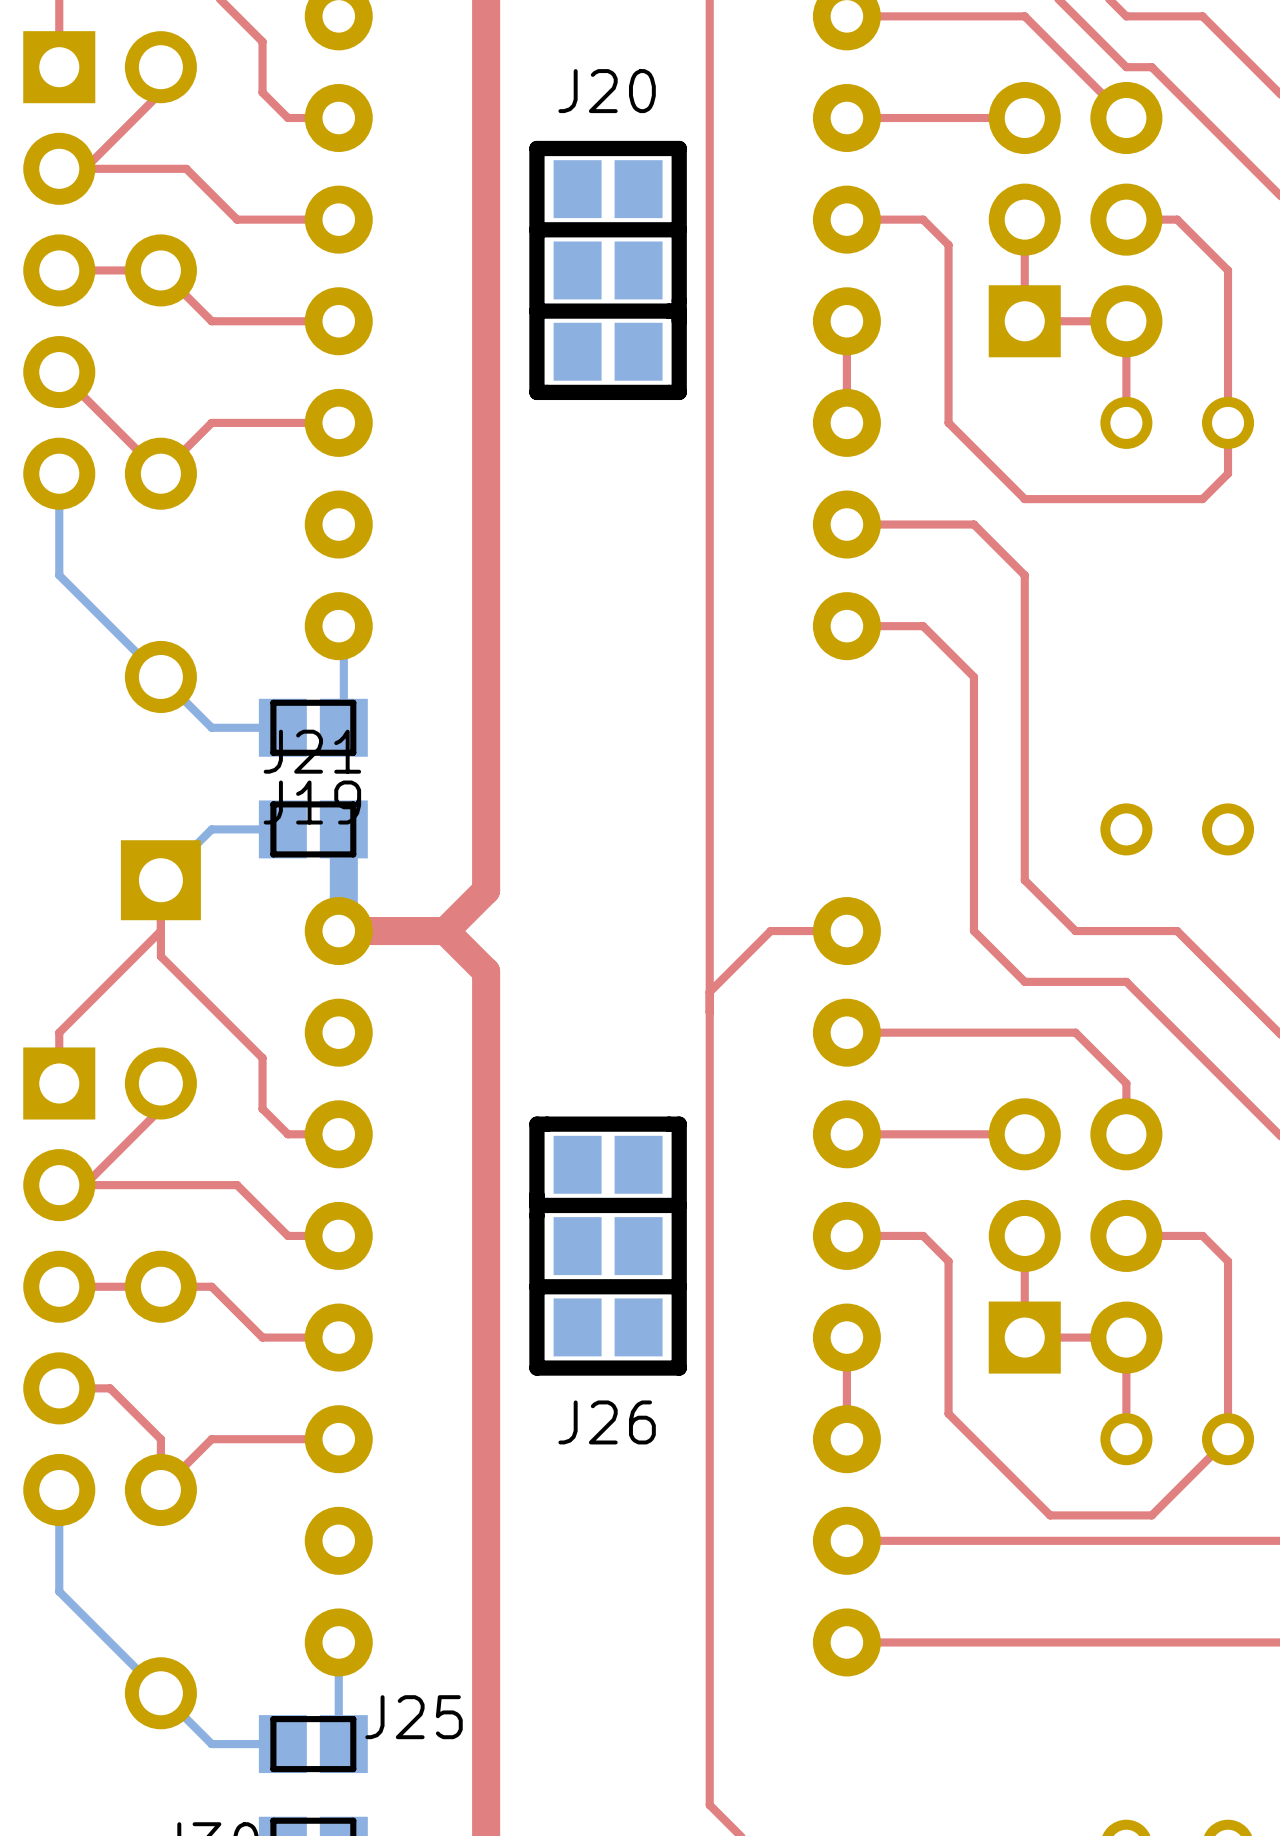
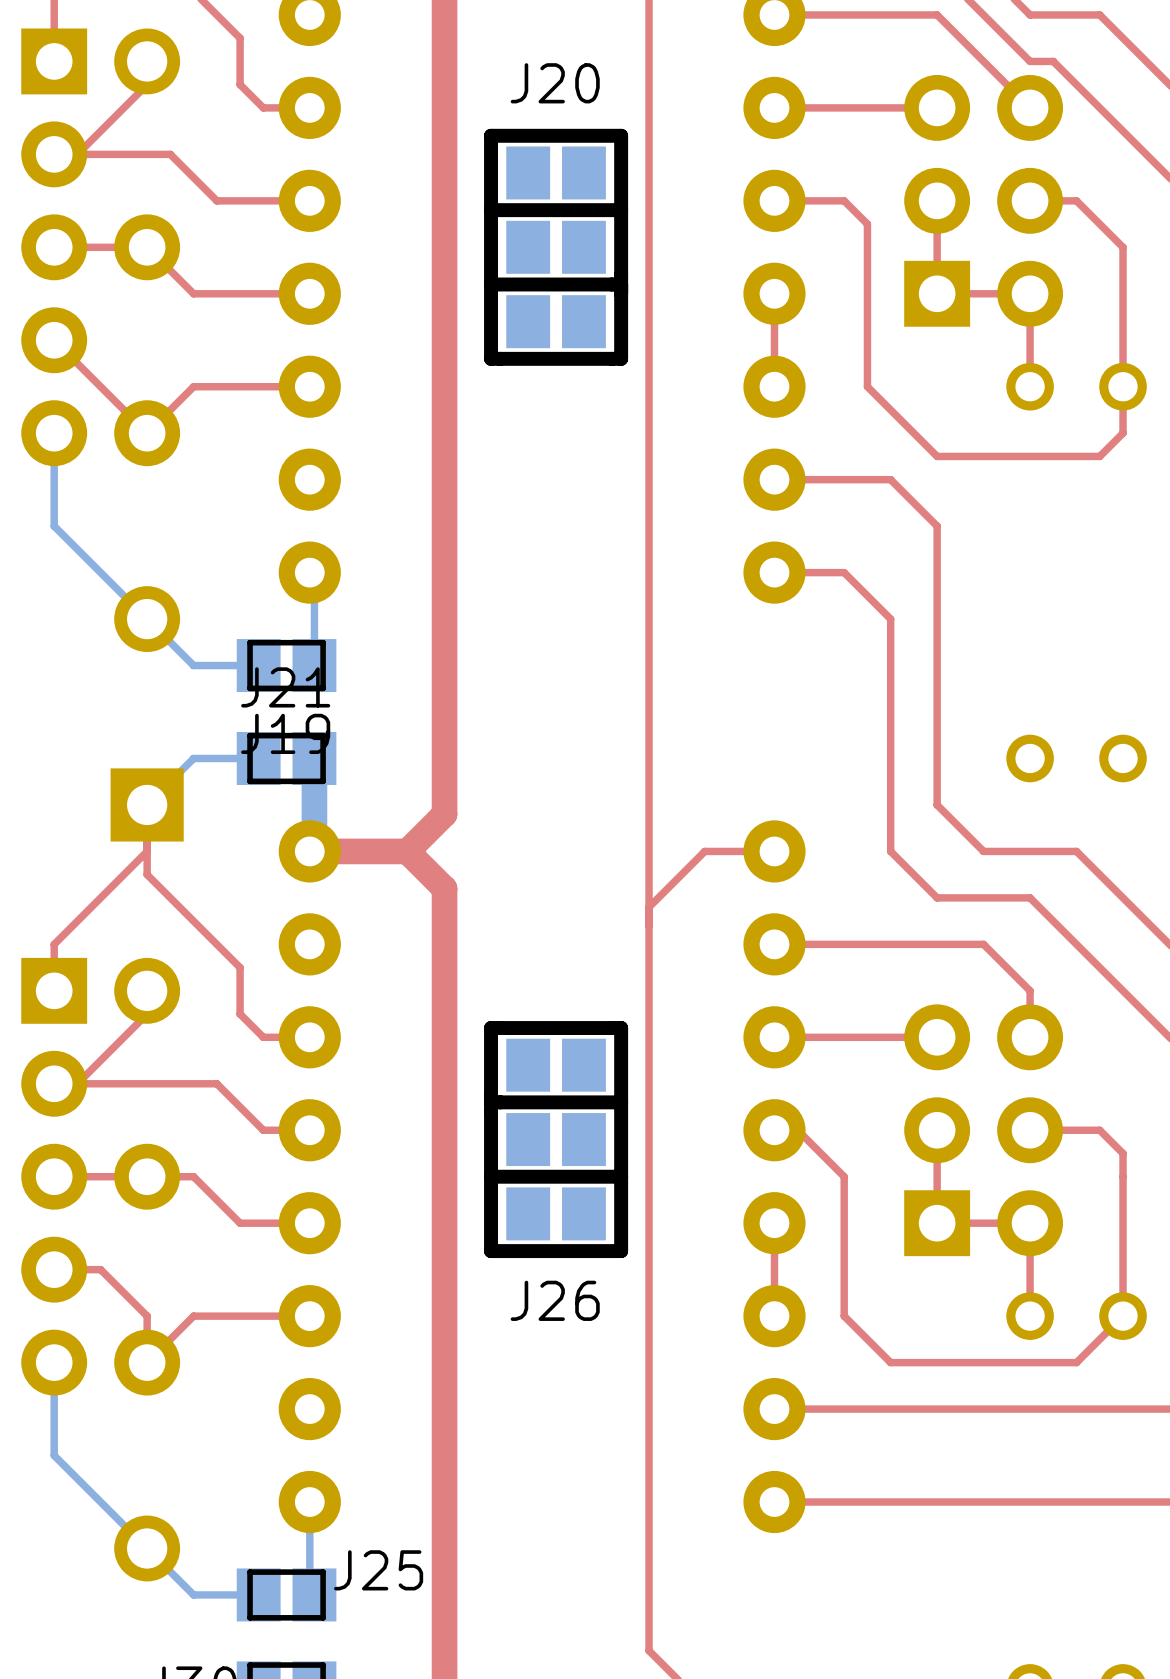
top track: (872, 1235) (923, 1235) (948, 1261) (948, 1413) (1050, 1515) (1151, 1515) (1177, 1490) -> (797, 1130) (844, 1176) (844, 1316) (890, 1362) (1076, 1362)

